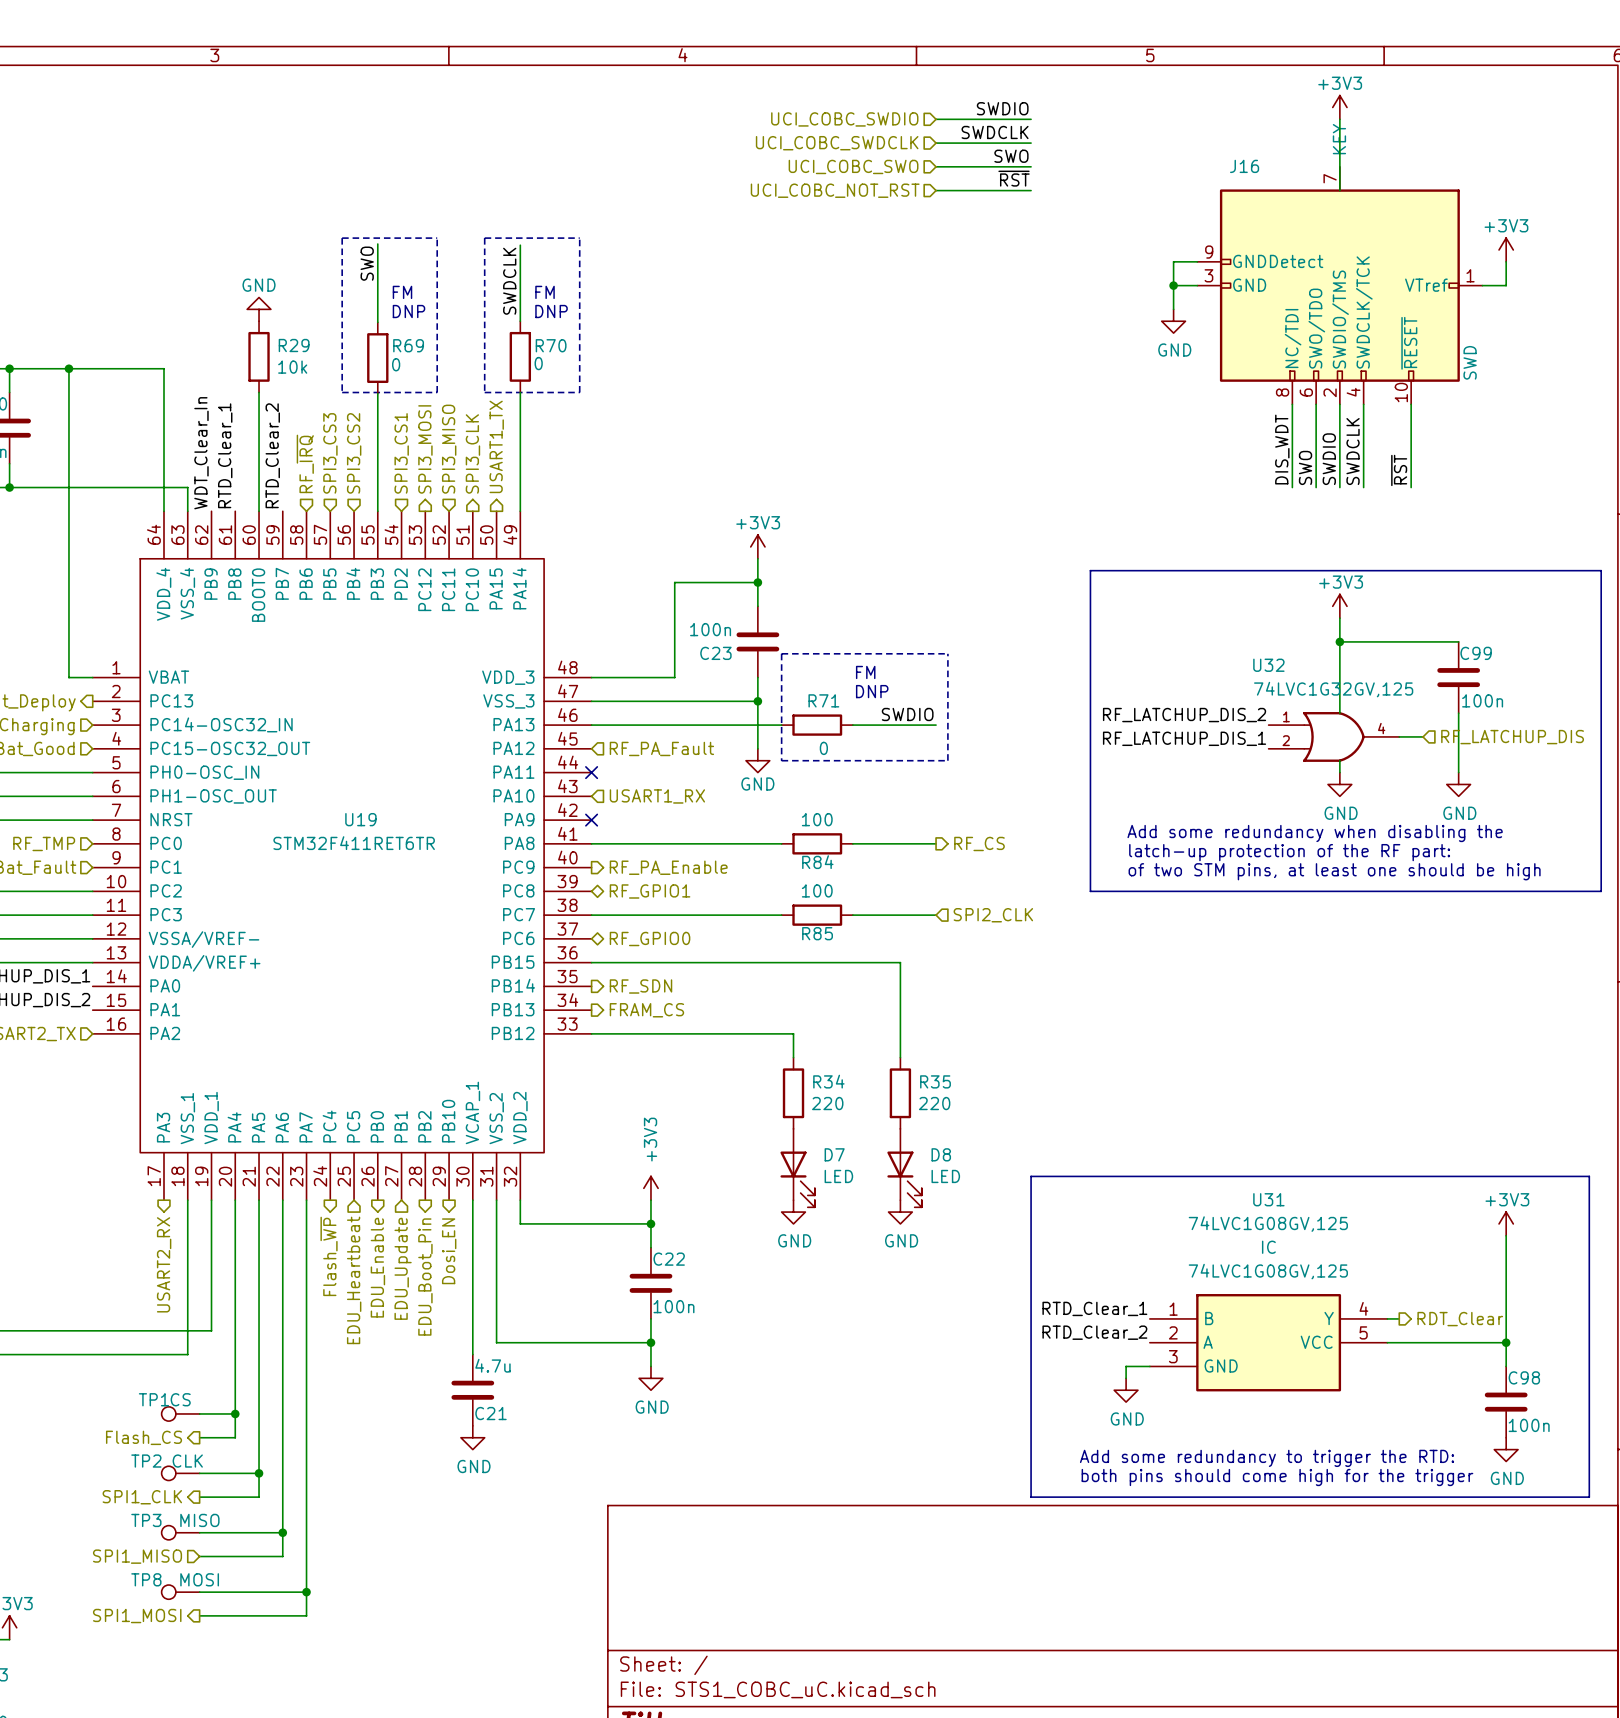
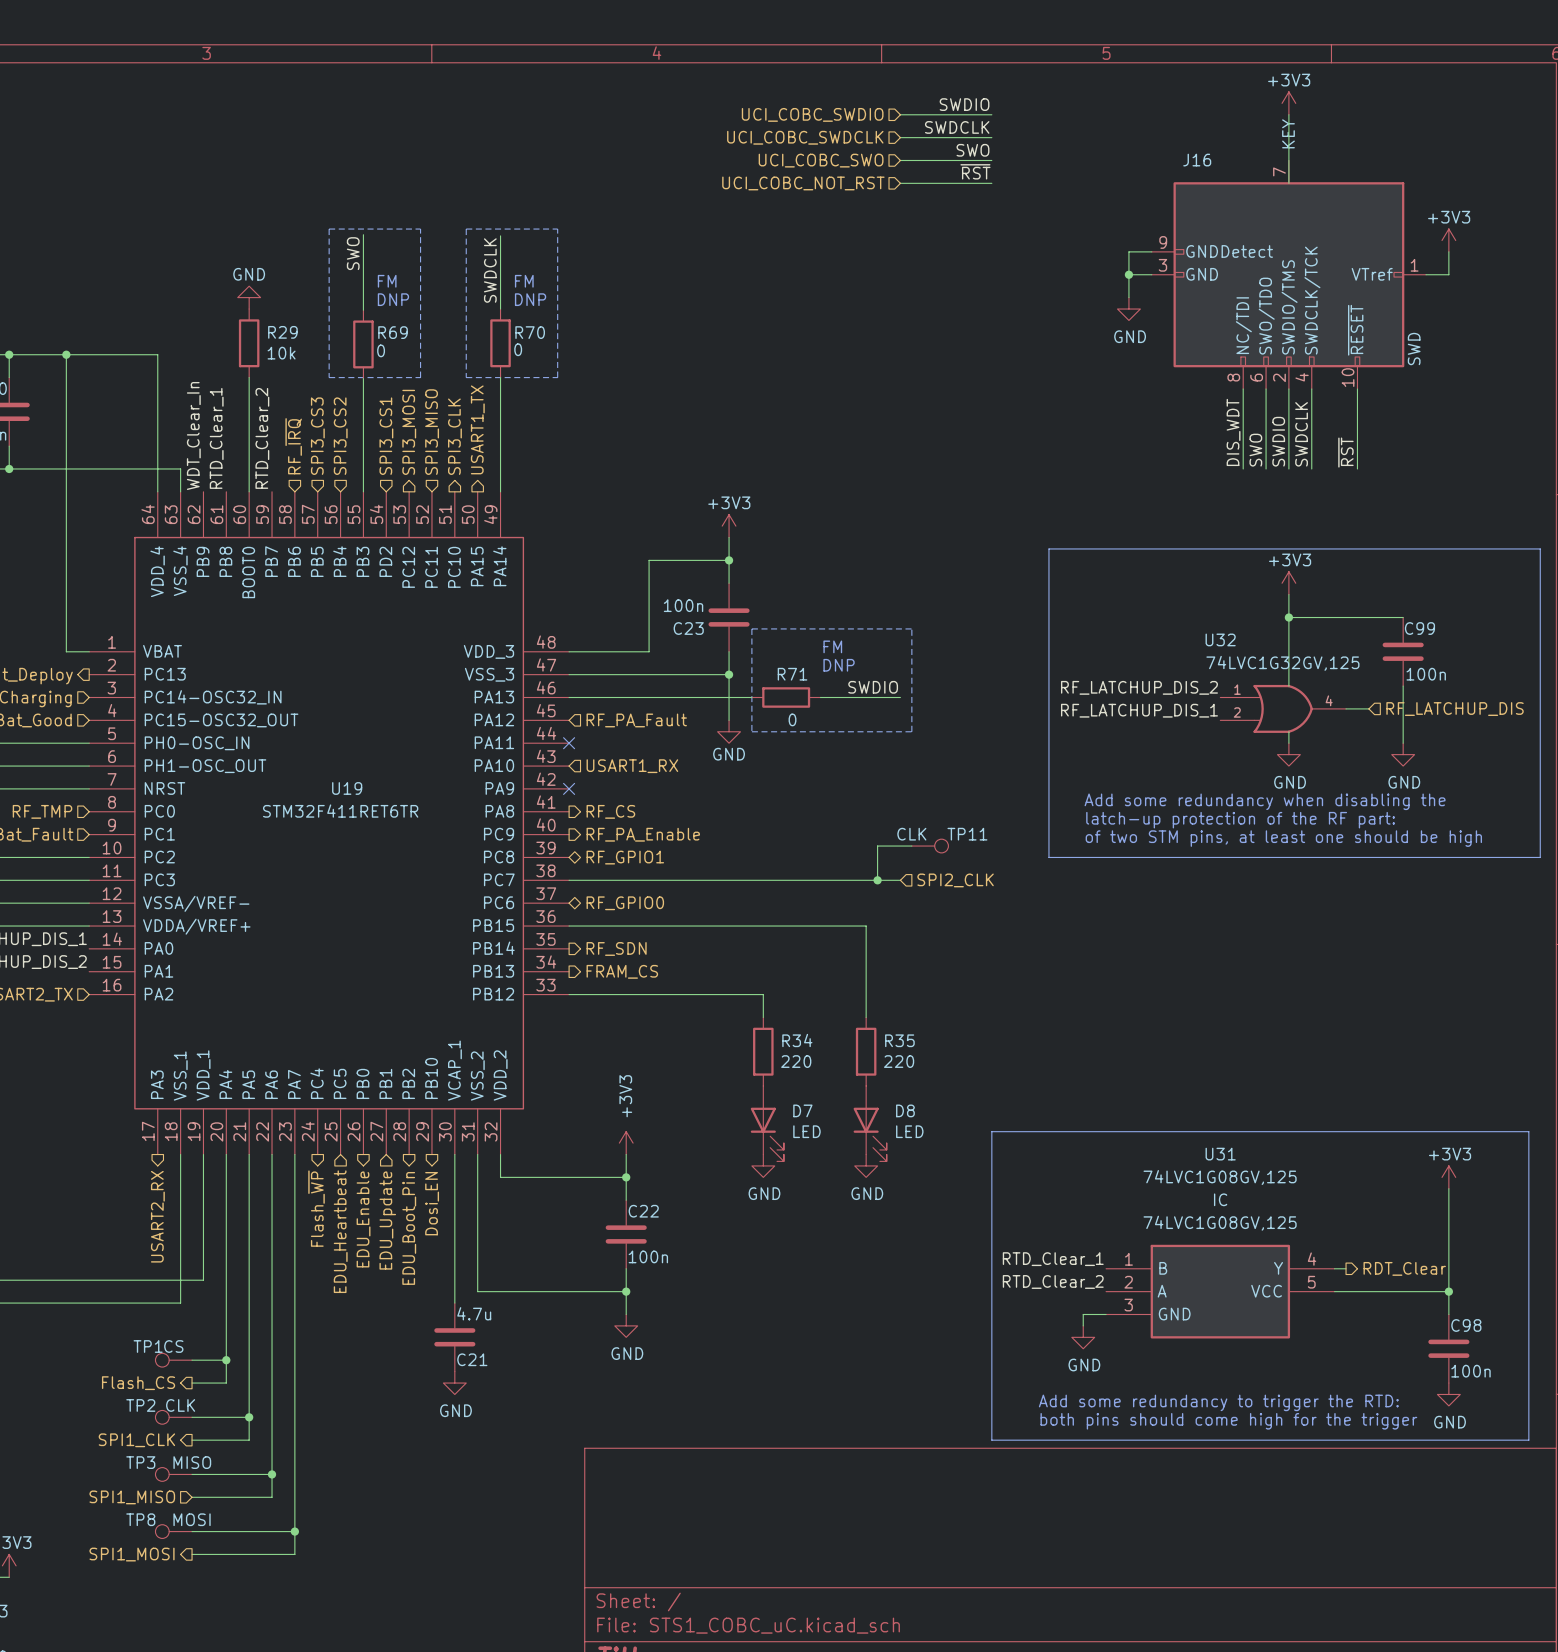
wire: (591, 843) (781, 843) -> none
hierarchical label: none -> RF_CS (610, 811)
R84: 100 (817, 843) -> none
wire: (852, 843) (936, 843) -> none
hierarchical label: RF_CS (979, 843) -> none
wire: none -> (911, 846) (877, 846) (877, 880)
TP11: none -> CLK (930, 846)
wire: none -> (751, 880) (820, 880)
R85: 100 (817, 915) -> none
junction: none -> (877, 880)

